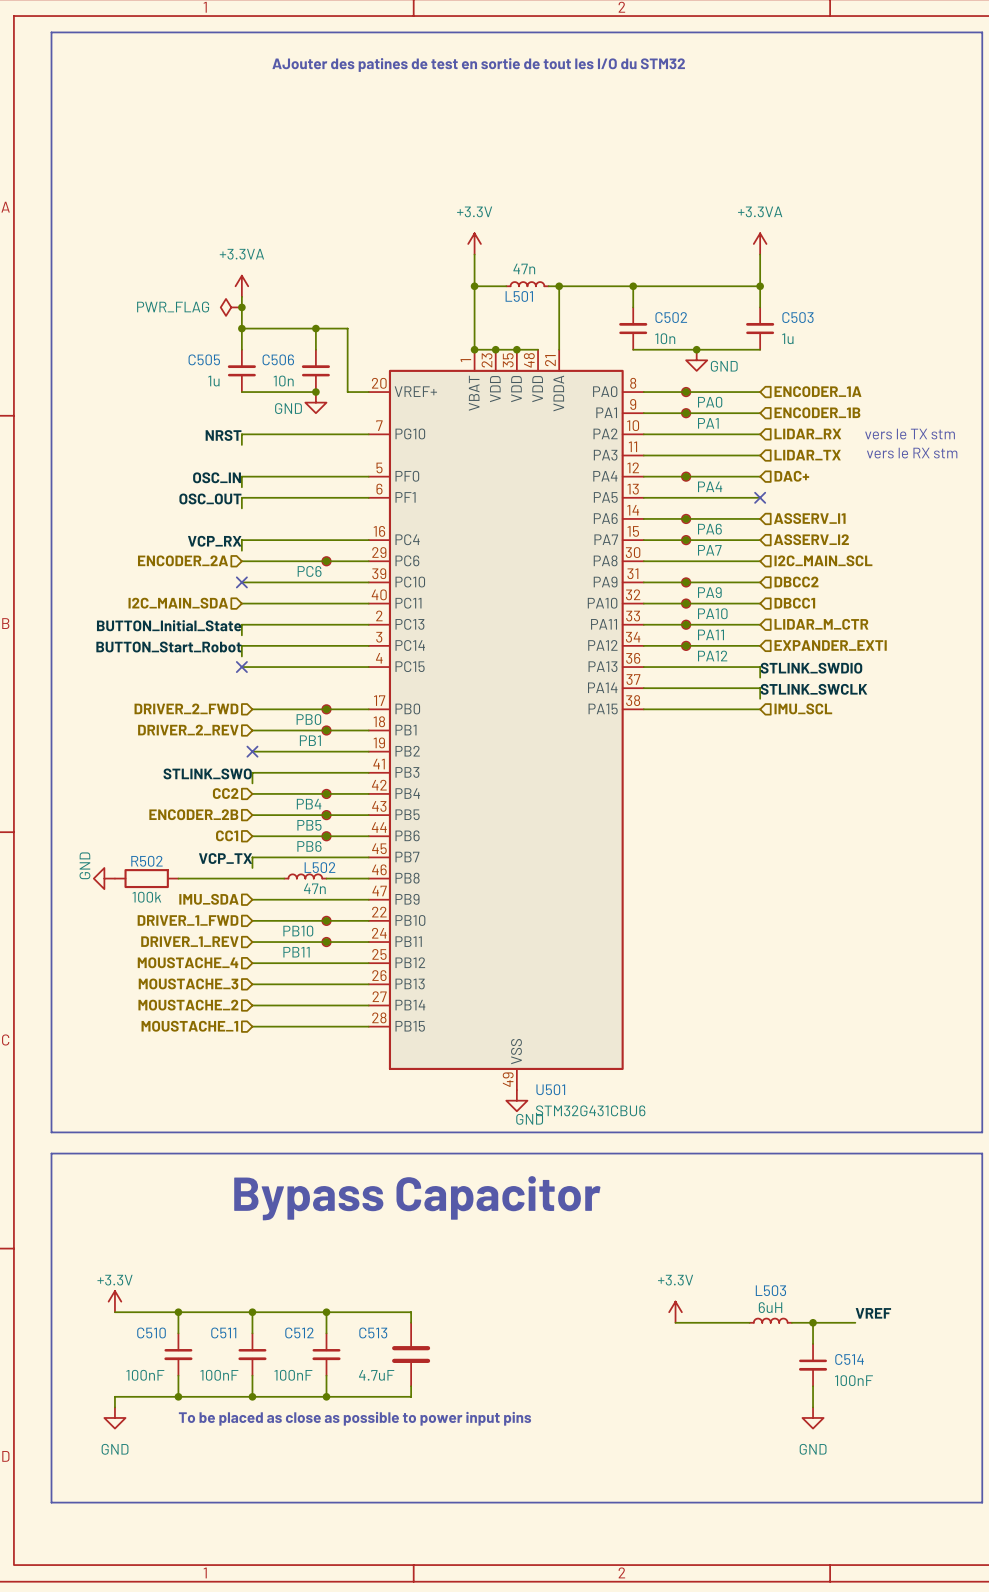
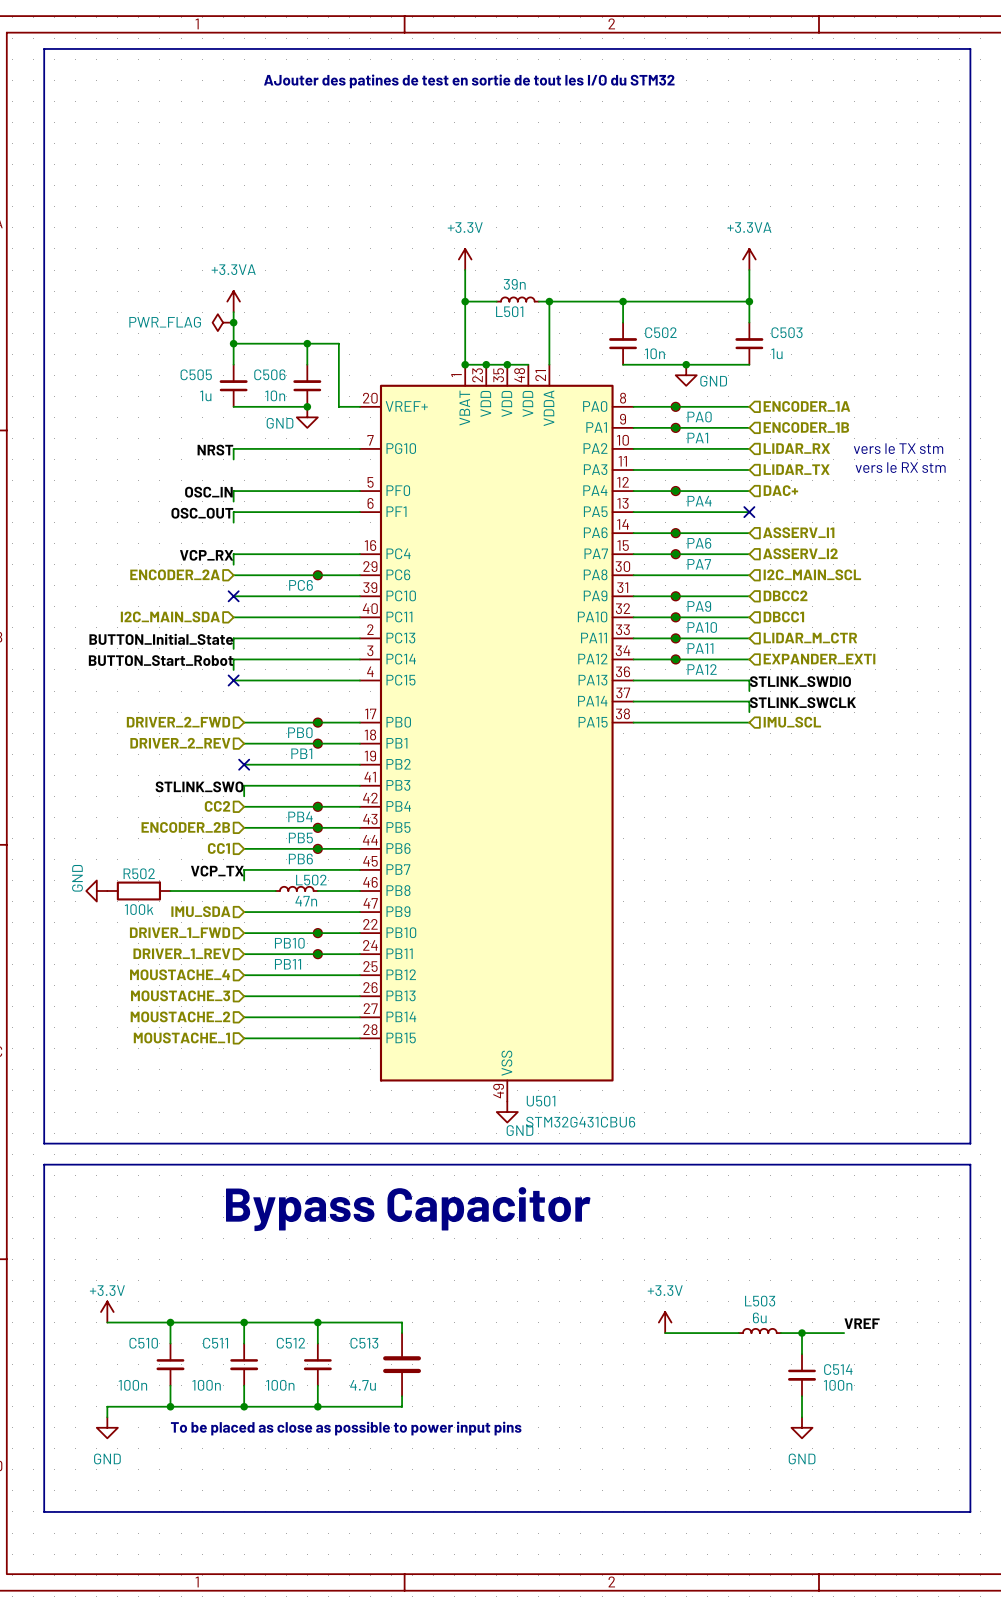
L501 value: 47n (524, 268) -> 39n (514, 284)
L503 value: 6uH (770, 1307) -> 6u (759, 1317)
C510 value: 100nF (145, 1375) -> 100n (132, 1385)
C511 value: 100nF (219, 1375) -> 100n (206, 1385)
C512 value: 100nF (293, 1375) -> 100n (280, 1385)
C513 value: 4.7uF (376, 1375) -> 4.7u (363, 1385)
C514 value: 100nF (854, 1380) -> 100n (838, 1385)

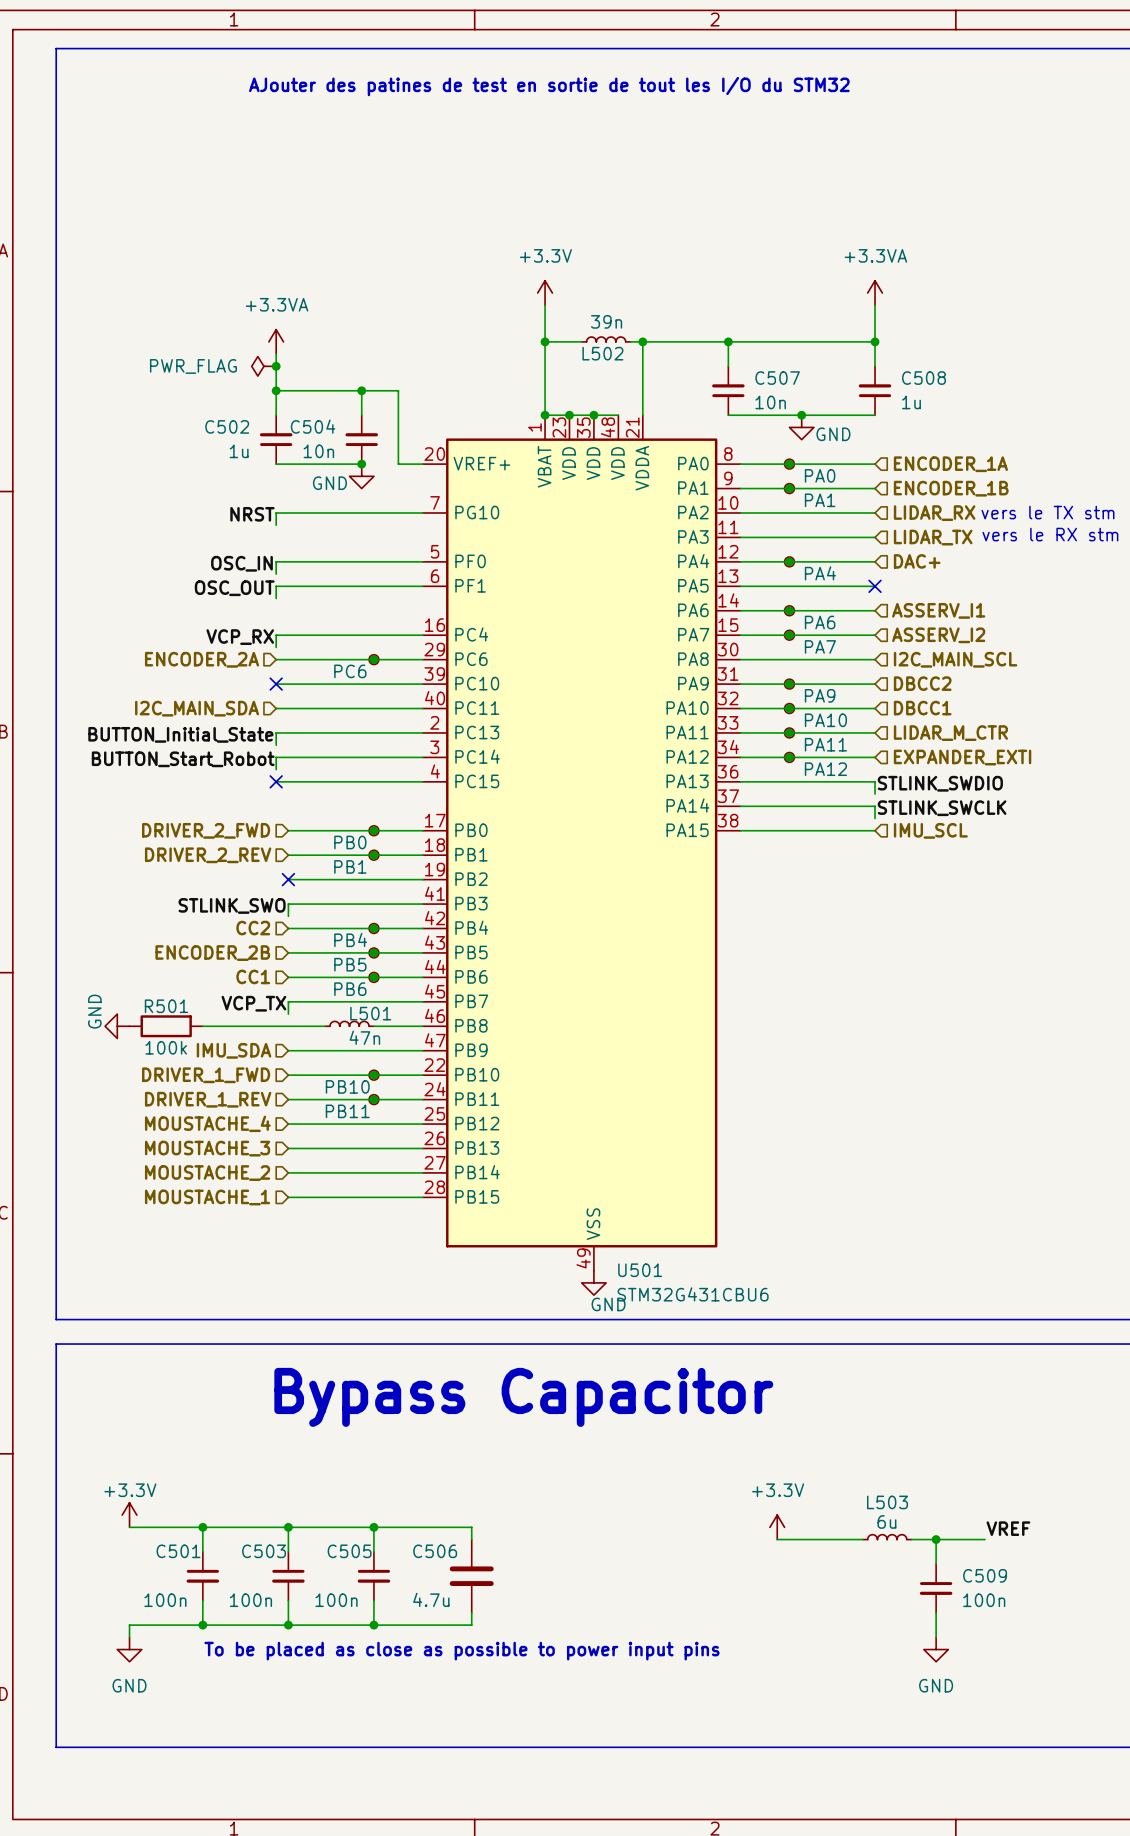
L501 name: L501 (509, 311) -> L502 (602, 353)
C502 name: C502 (660, 332) -> C507 (777, 378)
C503 name: C503 (787, 332) -> C508 (923, 378)
C505 name: C505 (196, 374) -> C502 (227, 426)
C506 name: C506 (269, 374) -> C504 (313, 426)
R502 name: R502 (139, 873) -> R501 (166, 1006)
L502 name: L502 (311, 880) -> L501 (370, 1013)
C510 name: C510 (143, 1343) -> C501 (178, 1551)
C511 name: C511 (215, 1343) -> C503 (264, 1551)
C512 name: C512 (290, 1343) -> C505 (349, 1551)
C513 name: C513 (364, 1343) -> C506 (435, 1551)
C514 name: C514 (838, 1369) -> C509 (985, 1575)

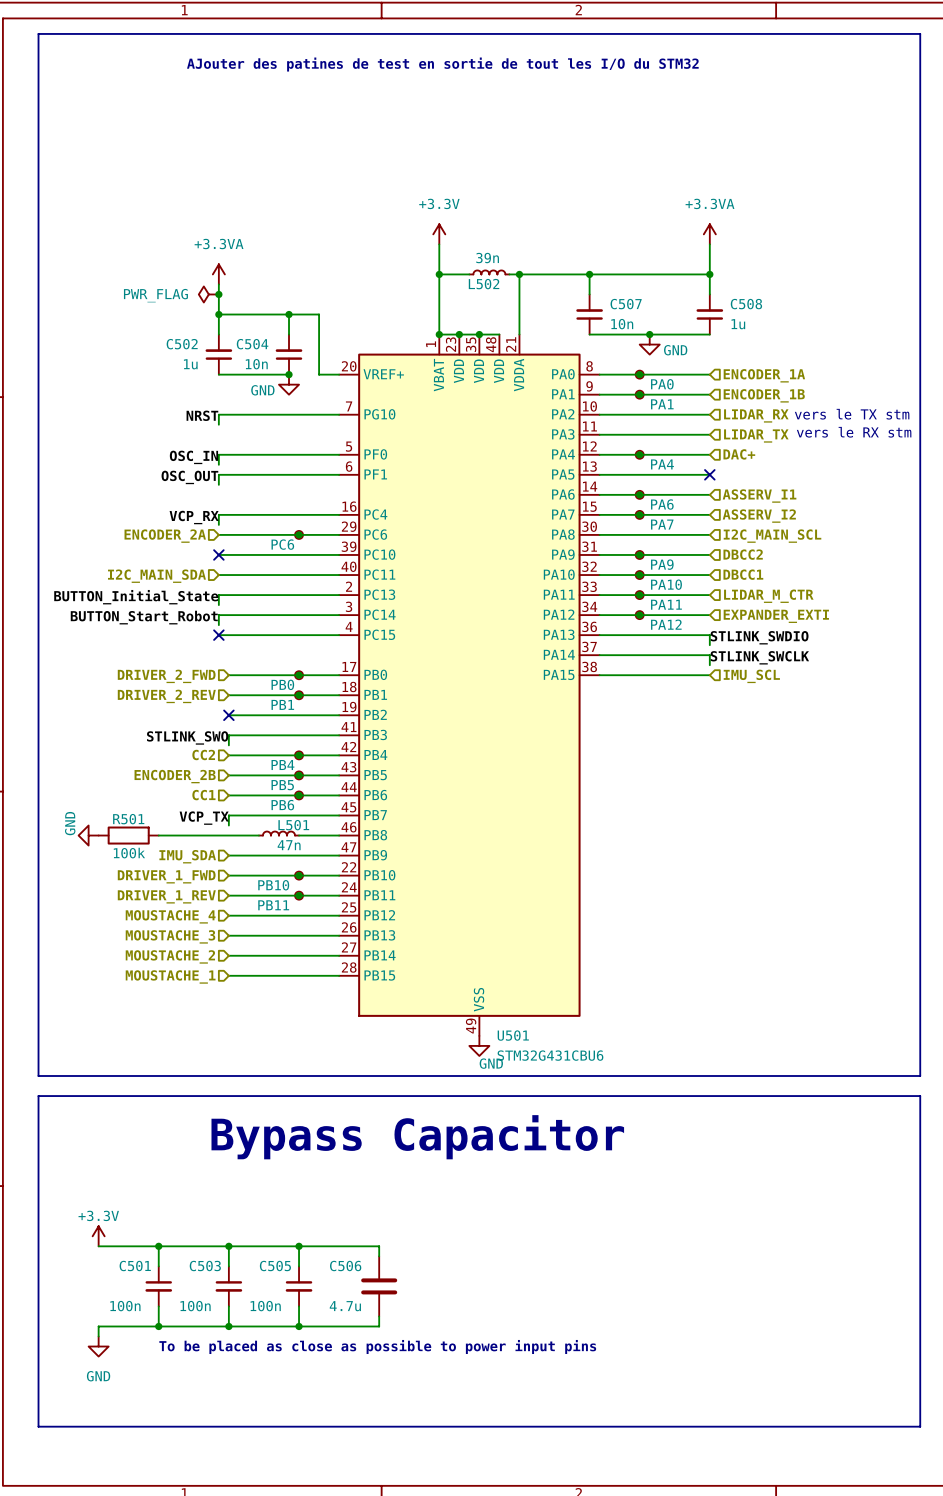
power symbol: +3.3V (777, 1527) -> none
label: VREF (1008, 1528) -> none
L503: 6u (887, 1537) -> none
wire: (777, 1539) (862, 1539) -> none
wire: (911, 1539) (985, 1539) -> none
wire: (936, 1539) (936, 1564) -> none
junction: (936, 1539) -> none
C509: 100n (936, 1588) -> none
wire: (936, 1612) (936, 1637) -> none
power symbol: GND (936, 1649) -> none

